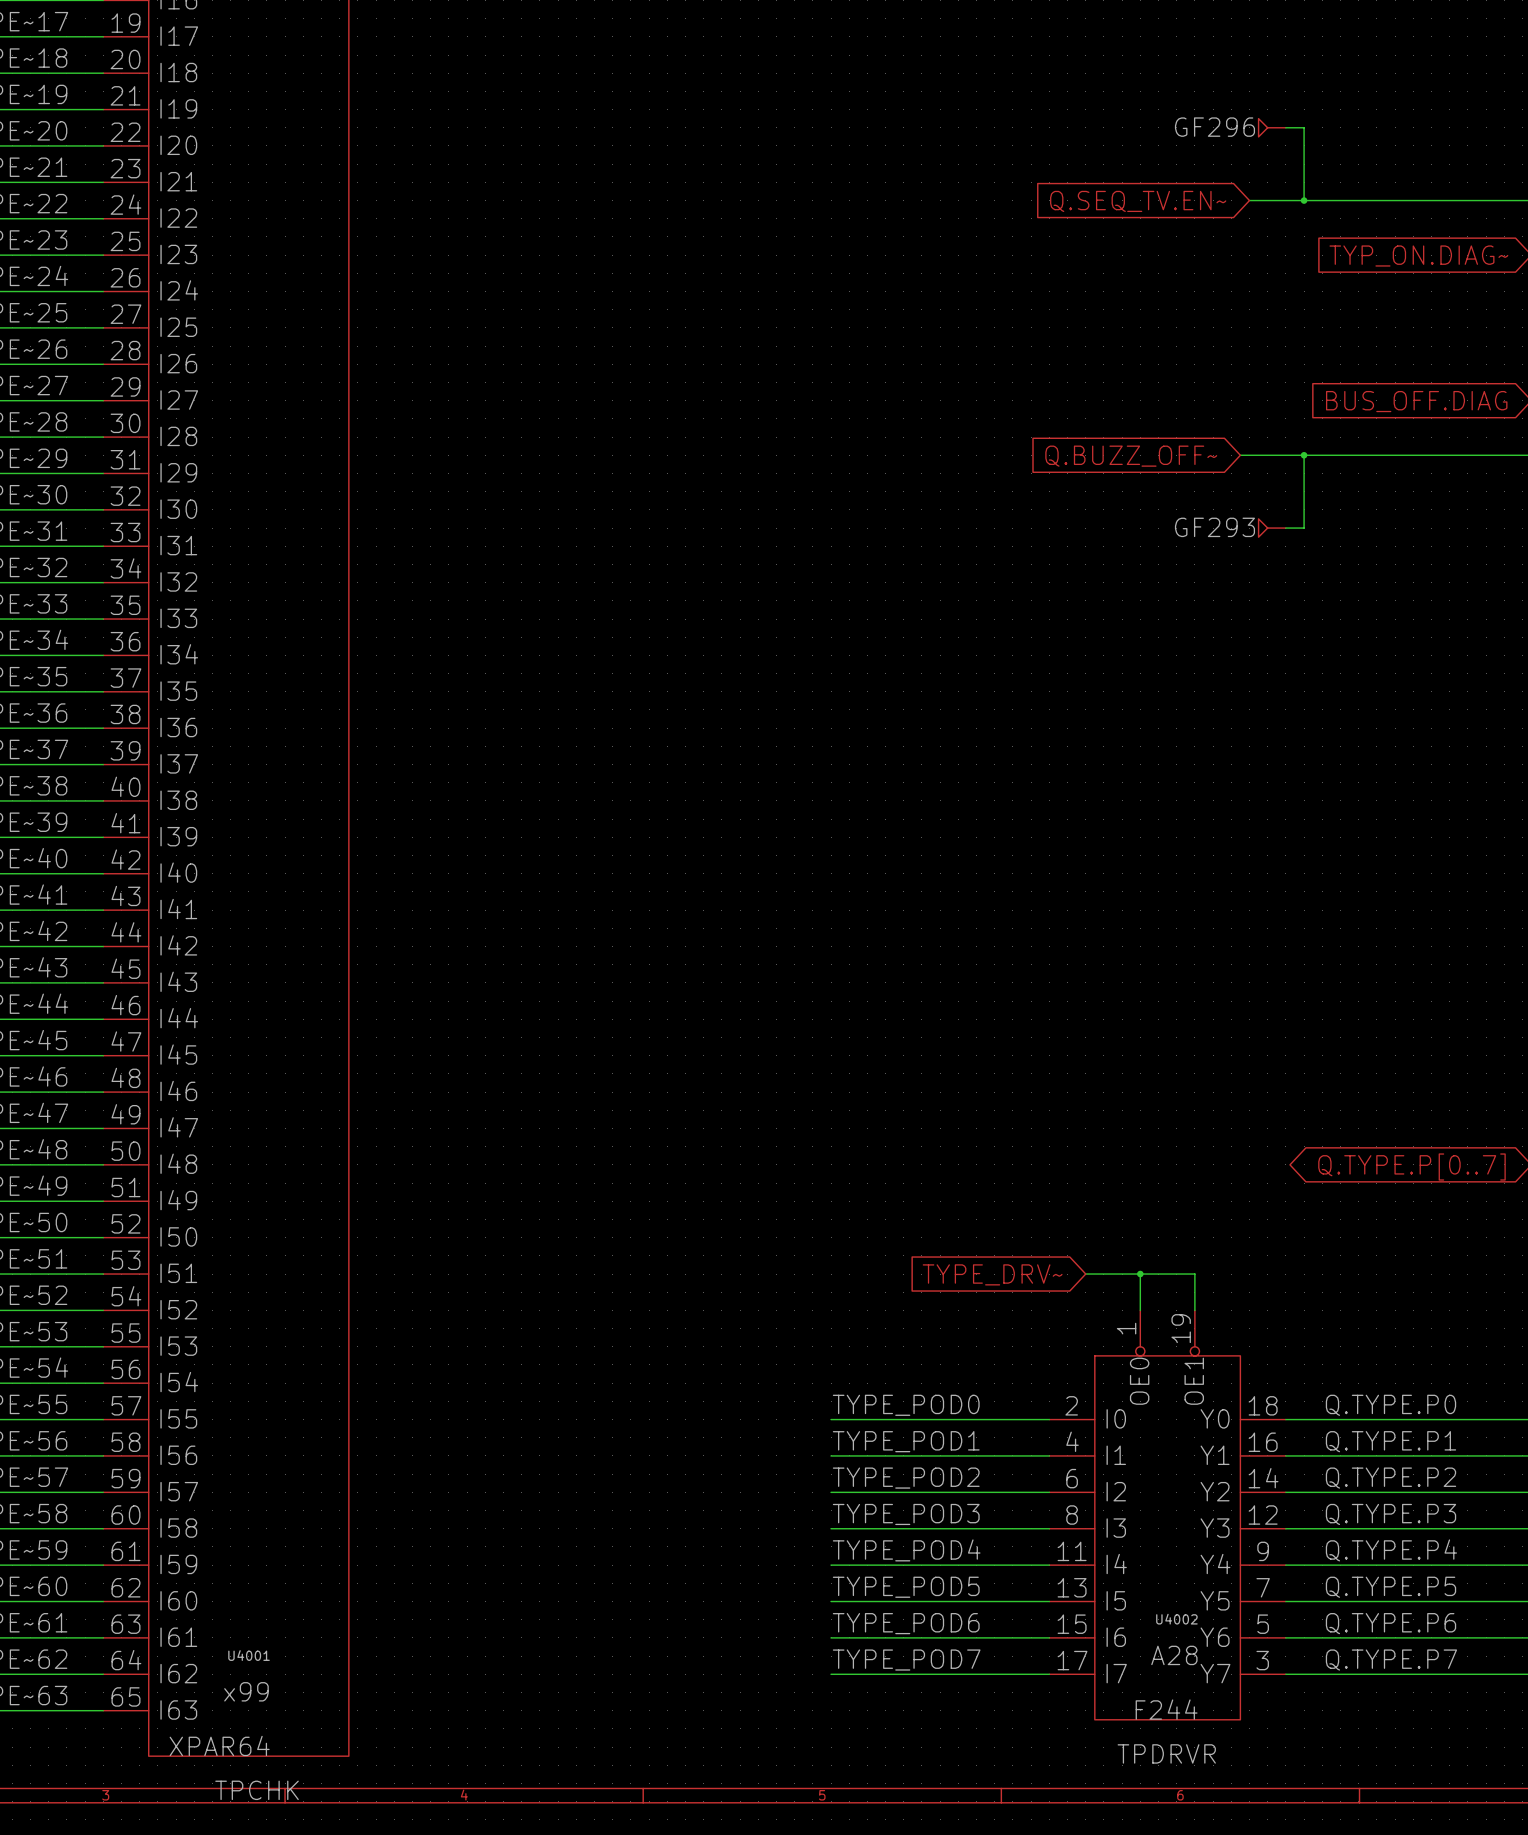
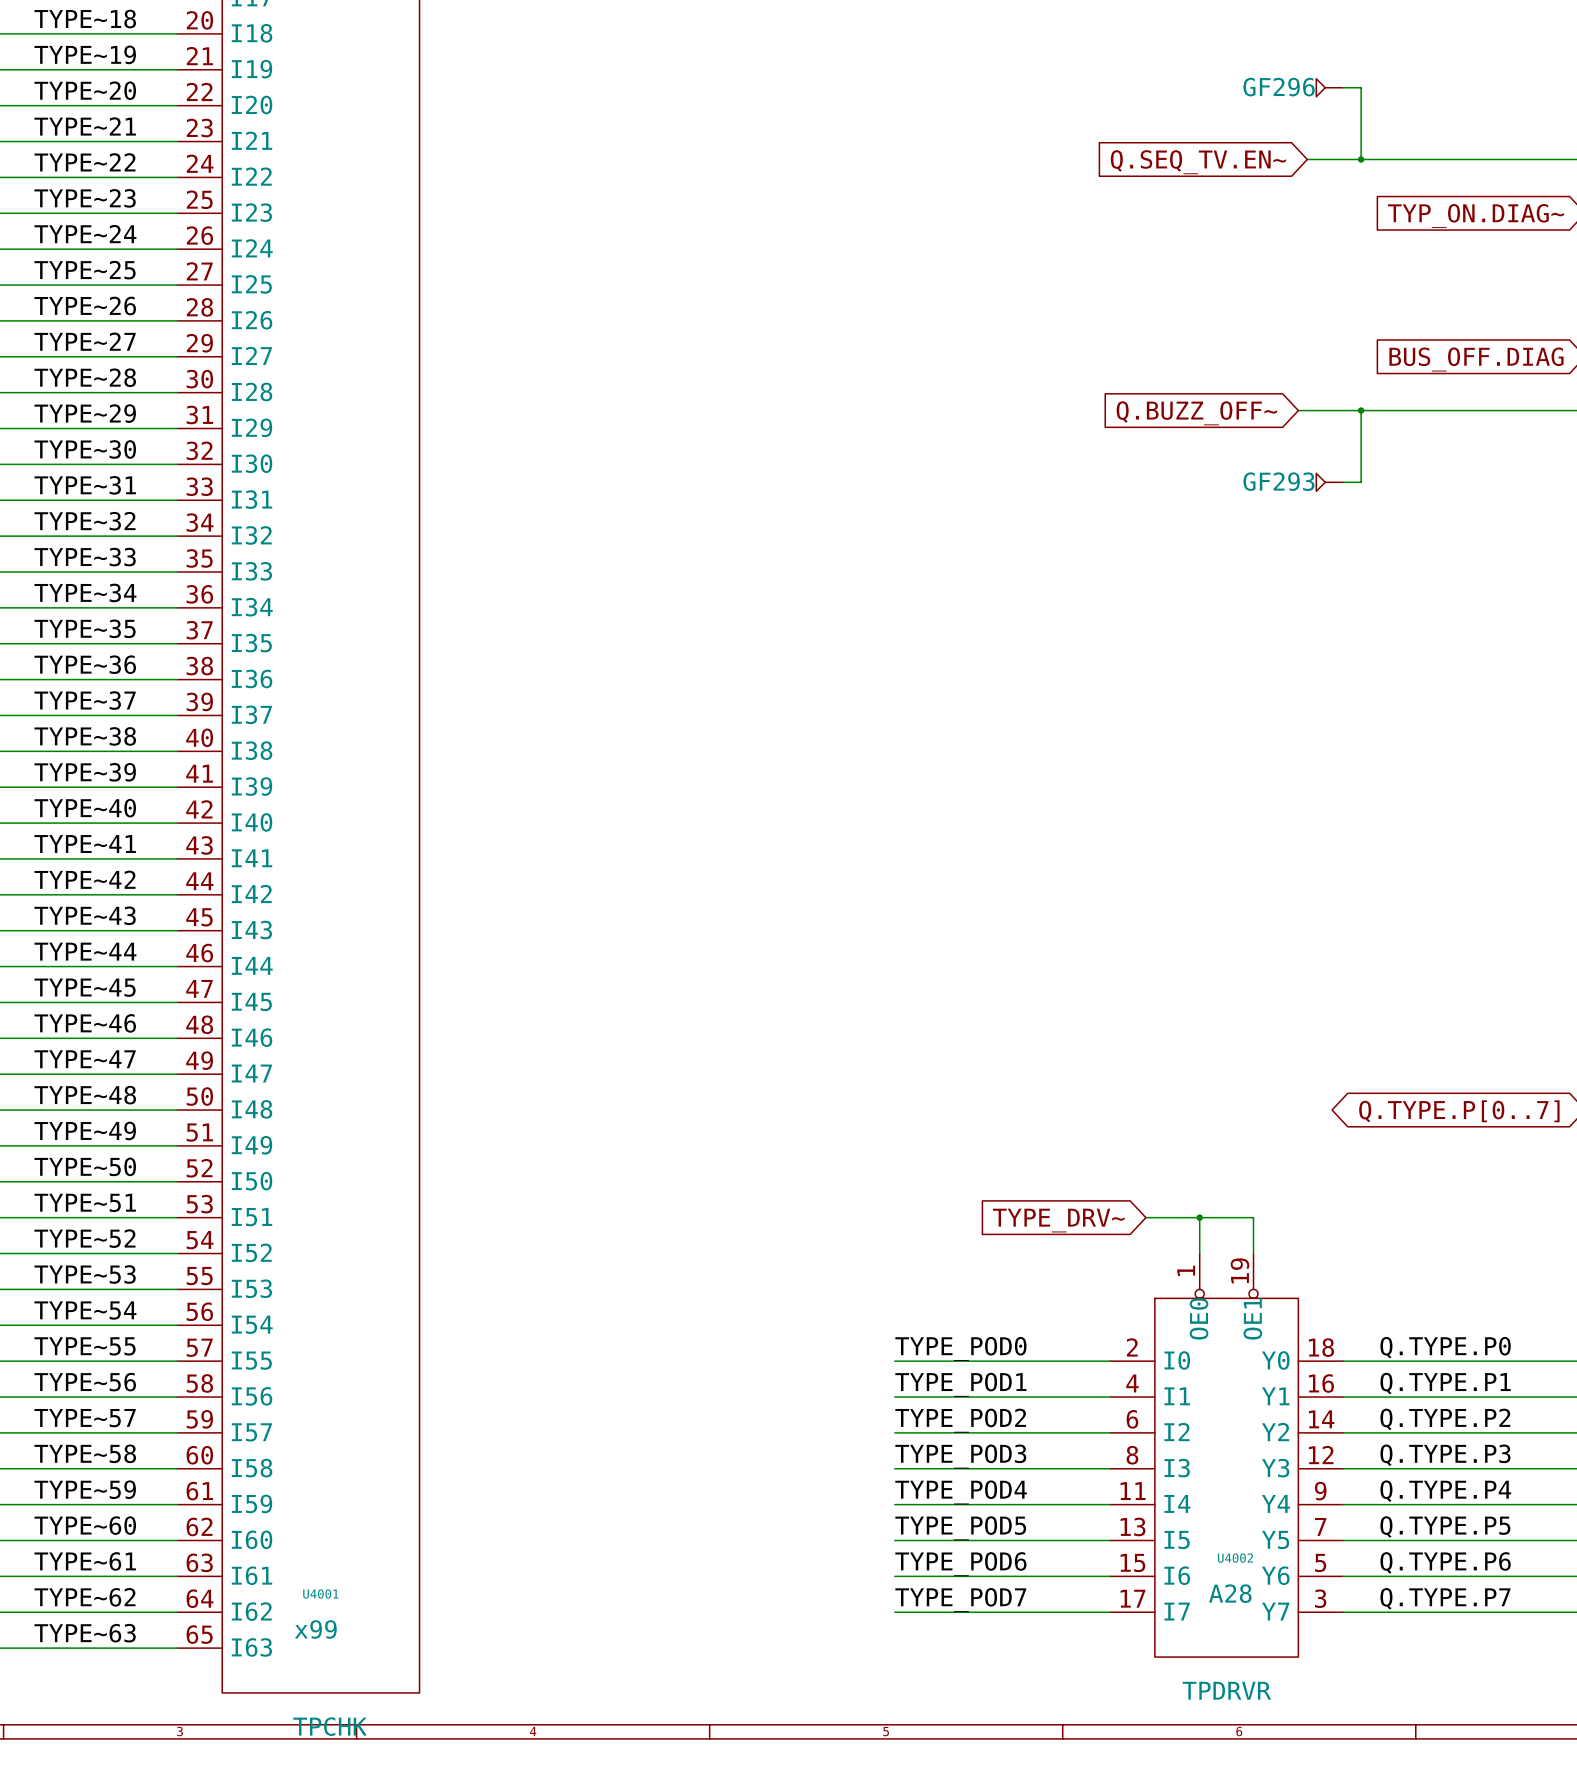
U4002 value: F244 (1166, 1709) -> none
U4001 value: XPAR64 (219, 1745) -> none

